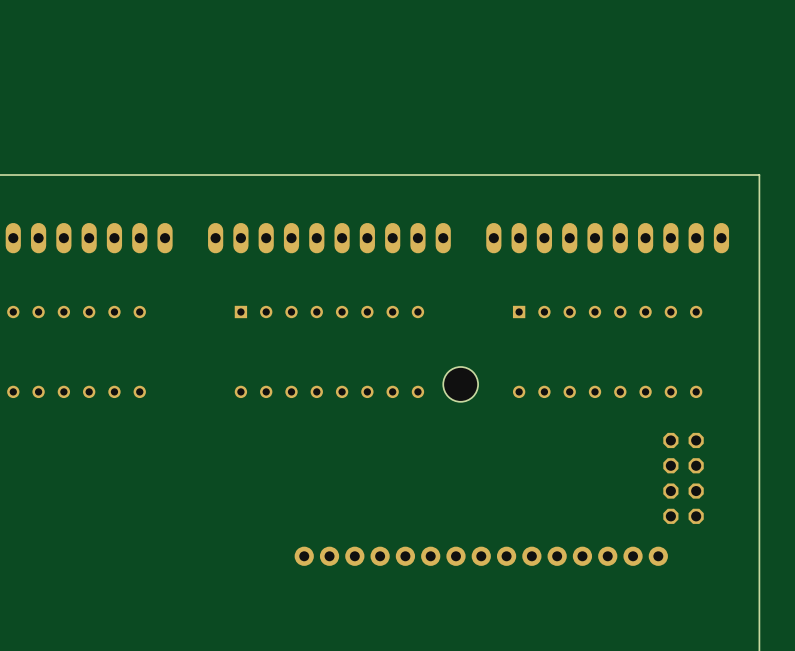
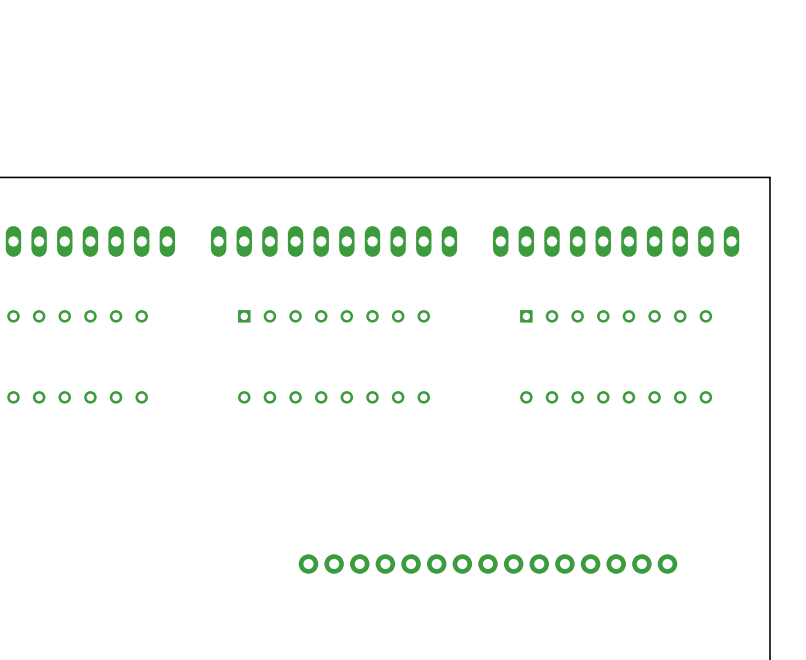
hole: (460, 384) -> none
part: (683, 478) -> none

